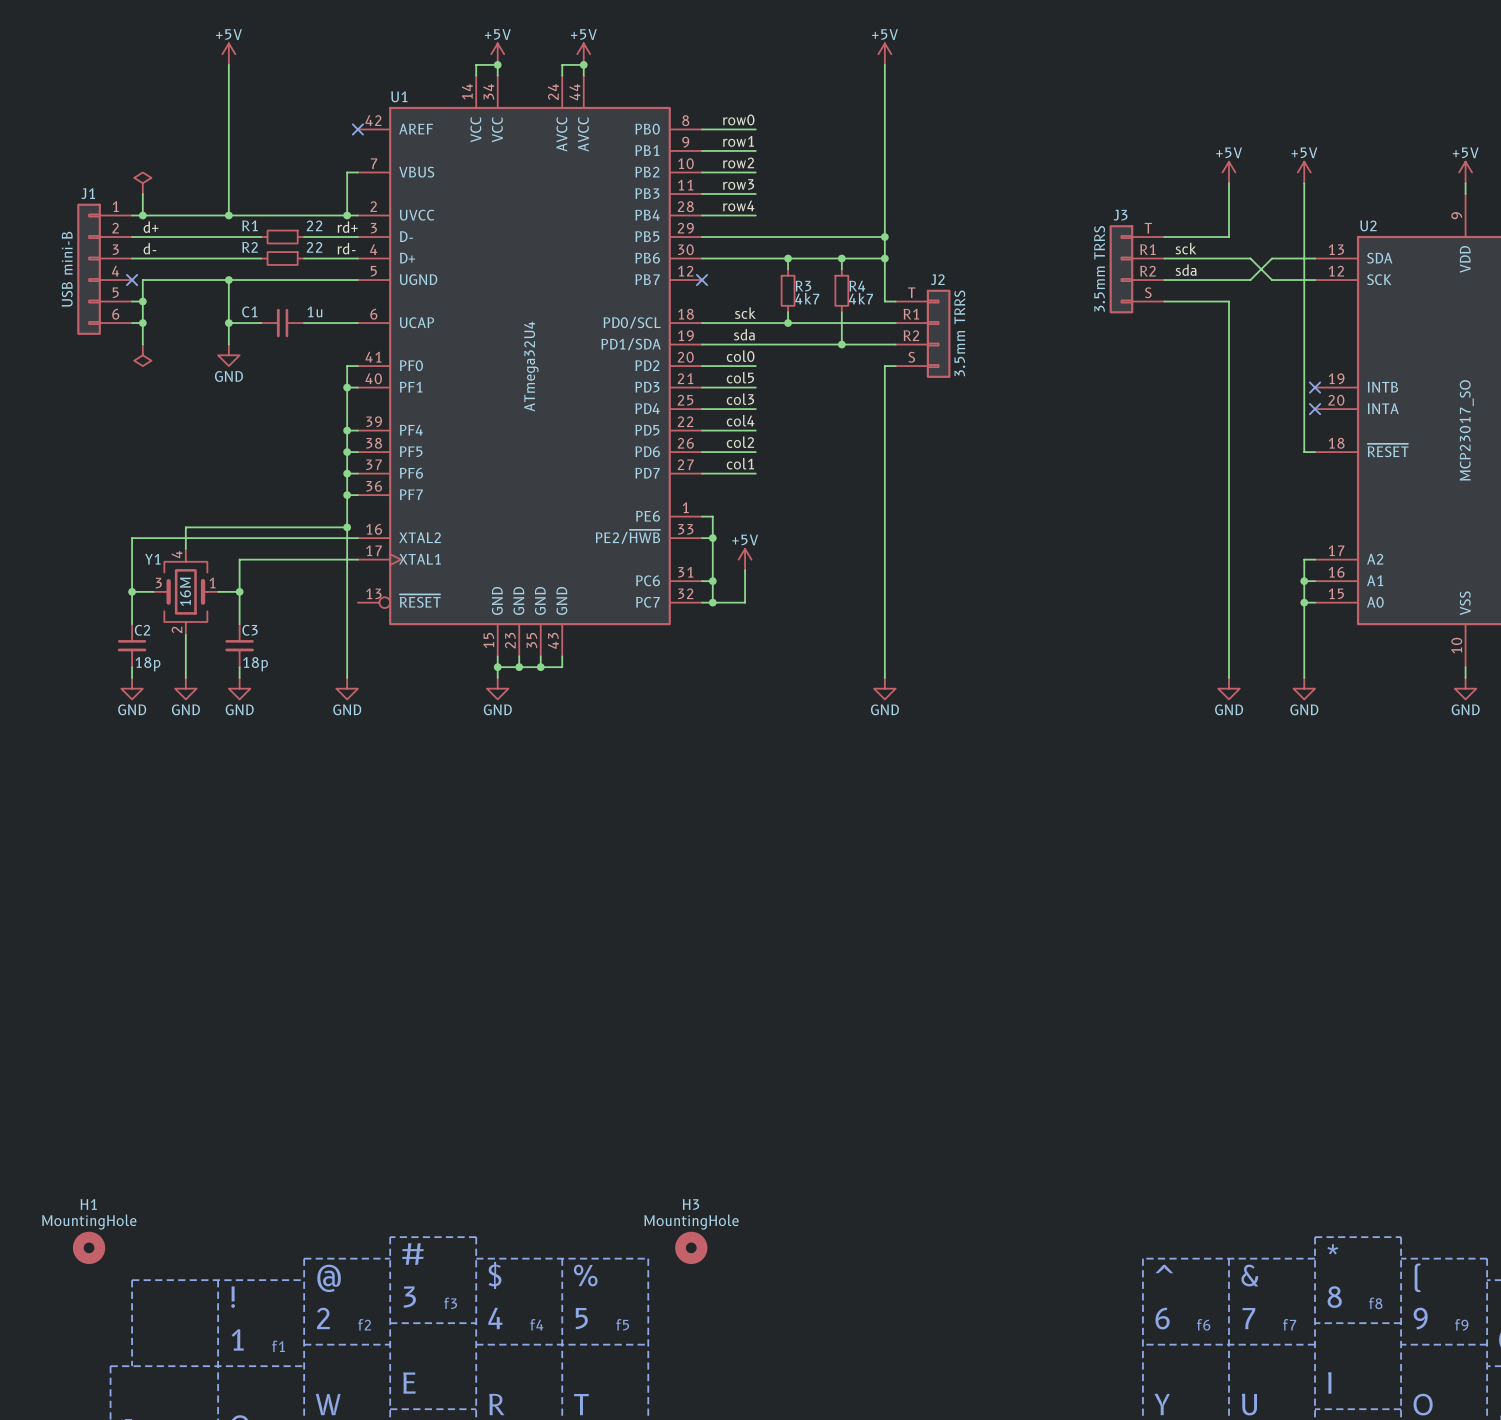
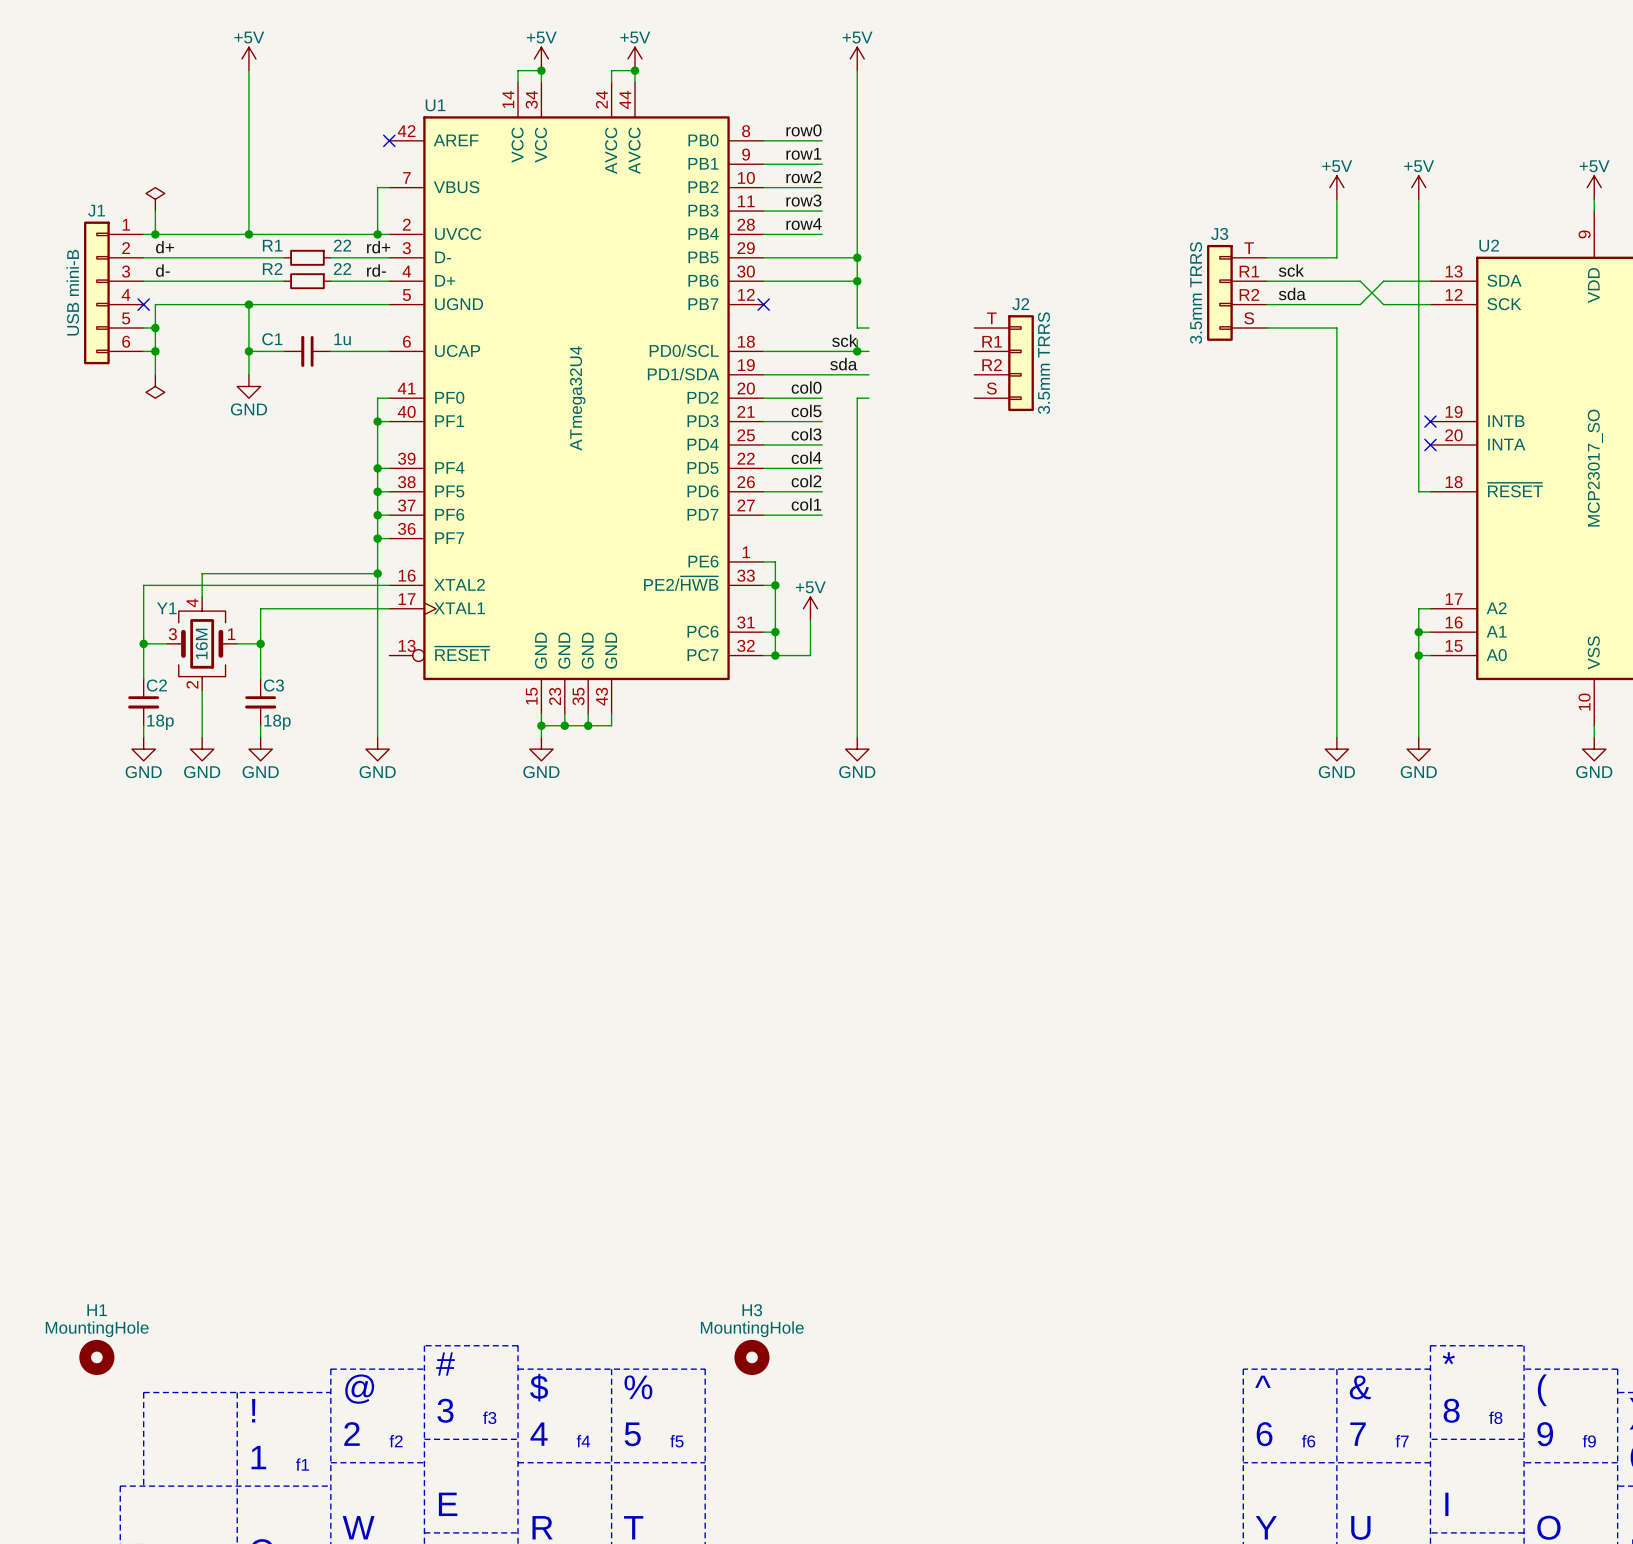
power symbol position: +5V (884, 54) -> +5V (857, 58)
wire: (884, 64) (884, 301) (895, 301) -> none
wire: (788, 237) (884, 237) -> none
junction: none -> (857, 257)
junction: (884, 237) -> none
wire: (788, 258) (884, 258) -> (857, 281) (857, 70)
wire: (841, 258) (841, 269) -> none
junction: (841, 258) -> none
junction: (884, 258) -> none
wire: none -> (857, 292) (857, 328) (868, 328)
R3: 4k7 (788, 290) -> none
R4: 4k7 (841, 290) -> none
wire: (841, 312) (841, 344) -> none
label position: sck (745, 313) -> sck (844, 340)
wire: (798, 323) (895, 323) -> none
label position: sda (744, 334) -> sda (843, 364)
wire: (798, 344) (895, 344) -> none
junction: (841, 344) -> none
wire: (895, 366) (884, 366) (884, 677) -> (868, 398) (857, 398) (857, 737)
power symbol position: GND (884, 688) -> GND (857, 749)

